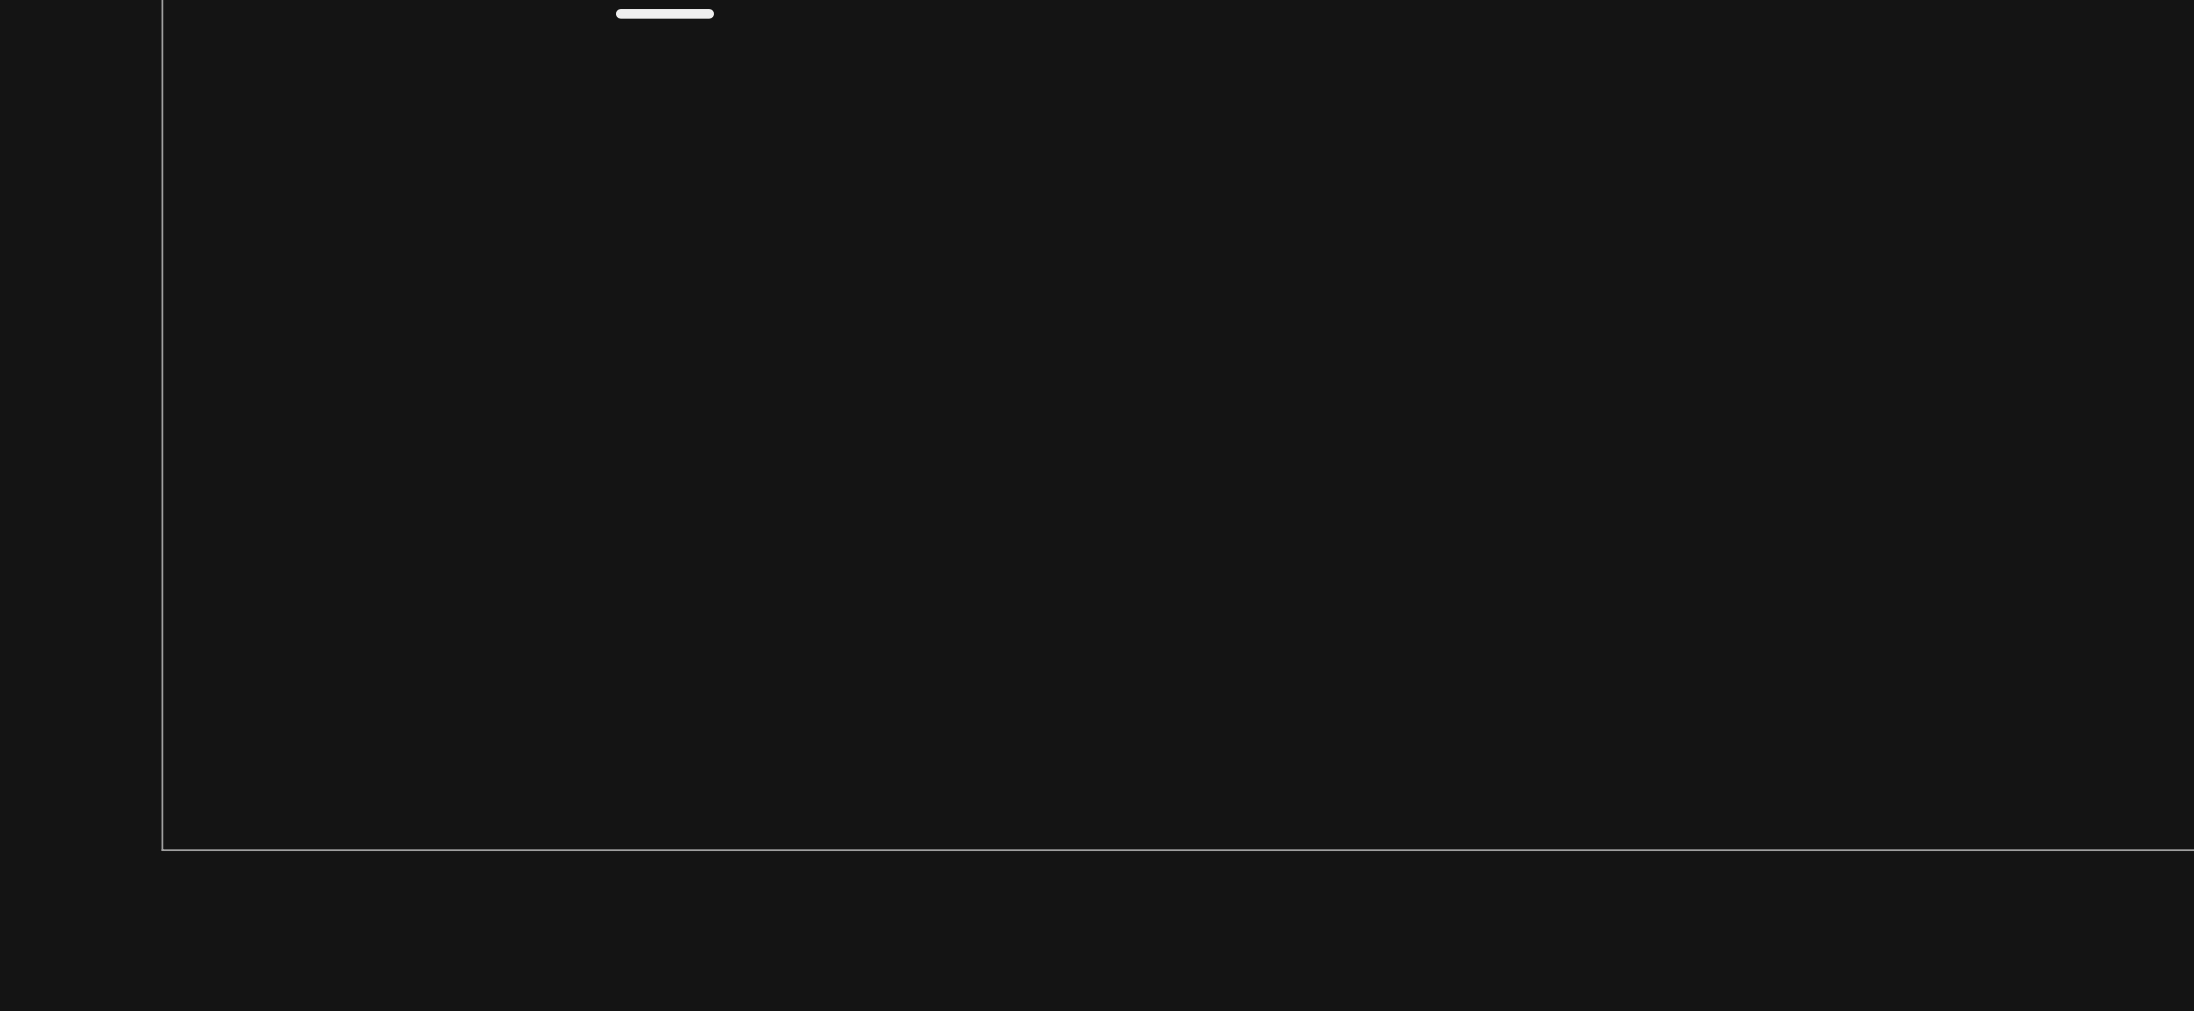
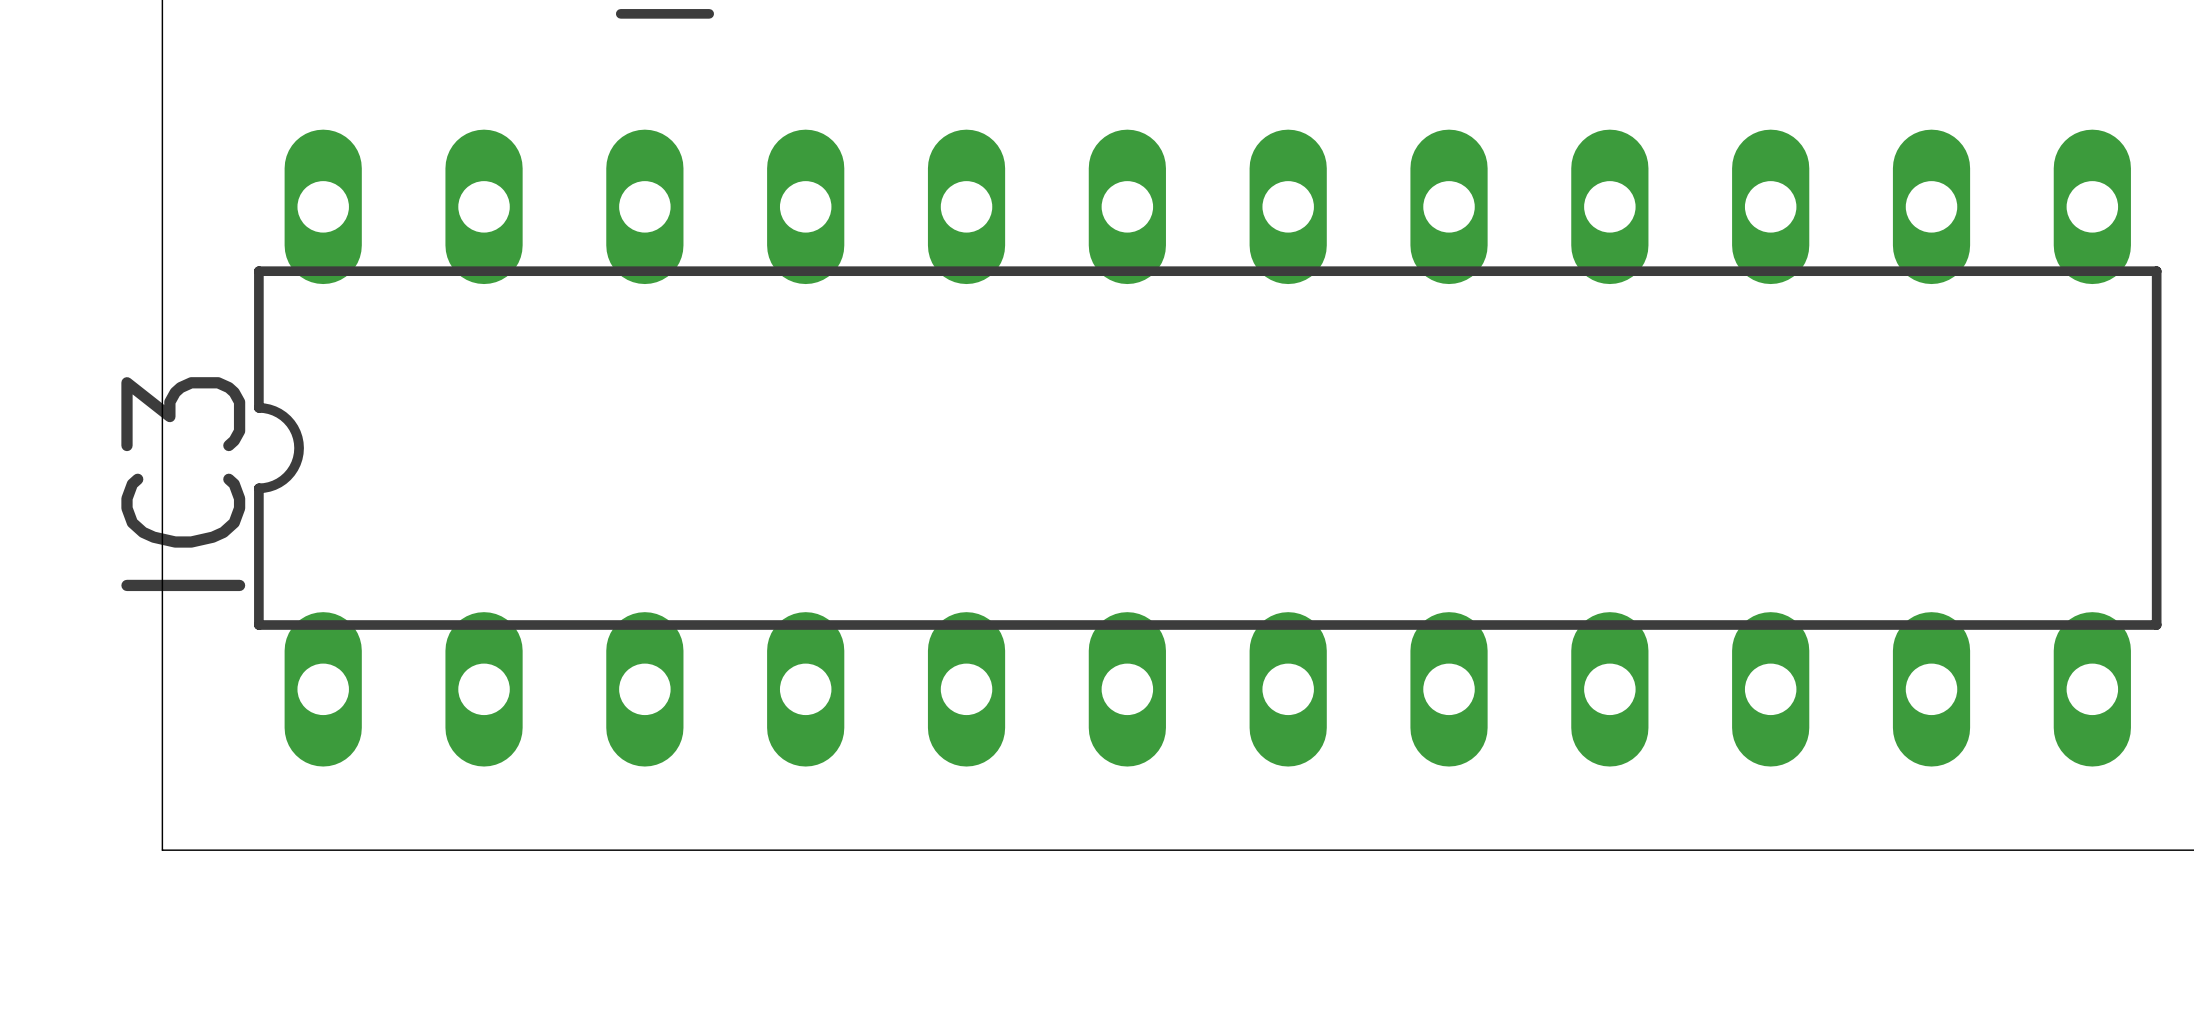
IC3: none -> (1207, 448)

